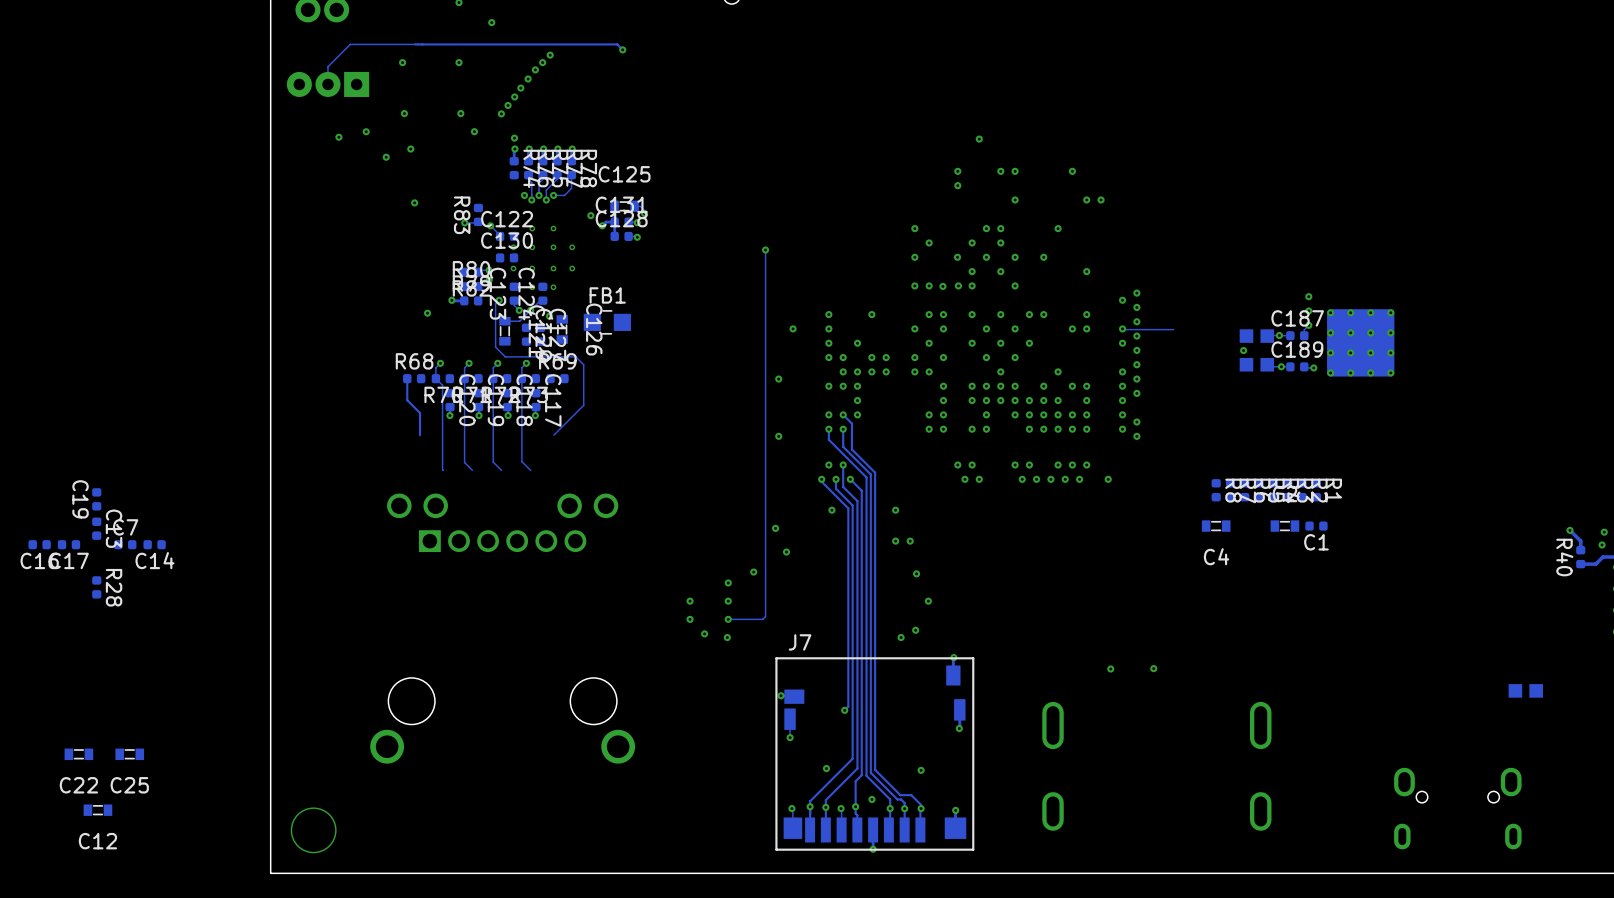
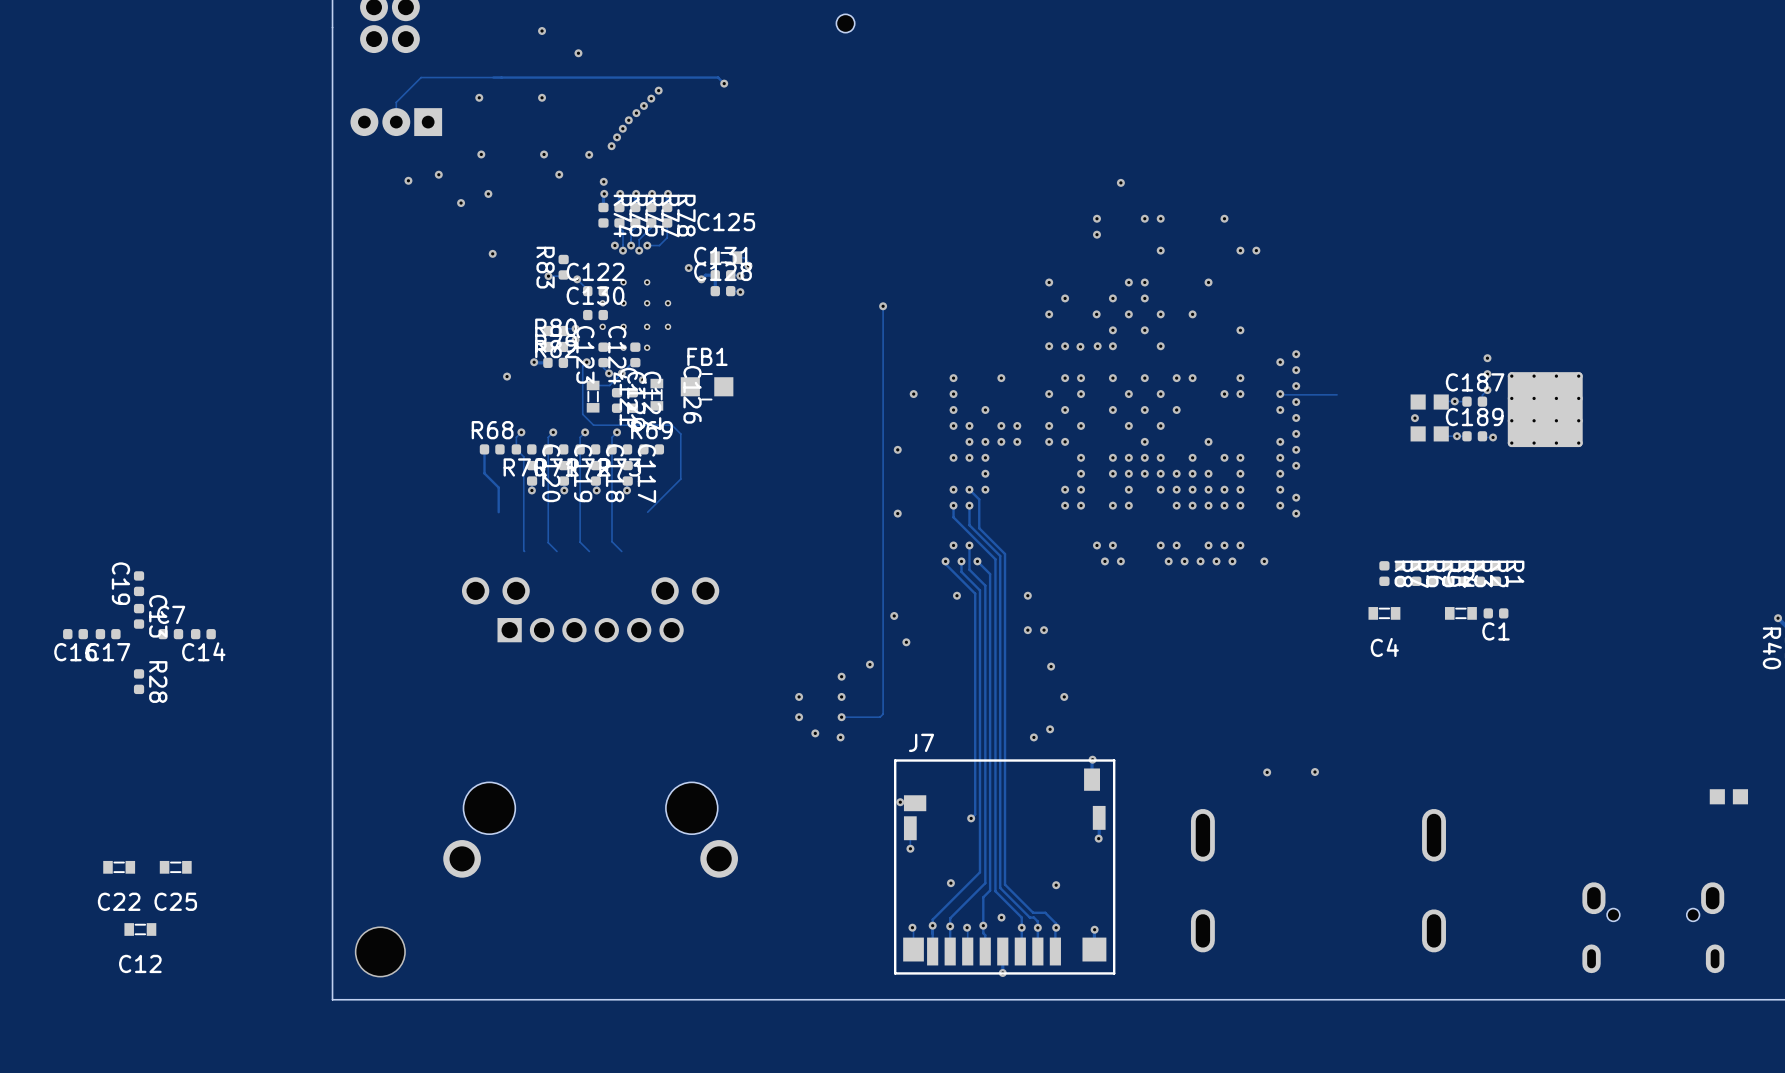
via: (550, 55) -> none
via: none -> (658, 90)
via: (542, 62) -> none
via: none -> (651, 98)
via: (535, 69) -> none
via: none -> (643, 105)
via: none -> (636, 113)
via: (528, 78) -> none
via: none -> (628, 120)
via: (520, 88) -> none
via: none -> (622, 128)
via: (514, 96) -> none
via: none -> (617, 137)
via: (508, 105) -> none
via: none -> (611, 146)

